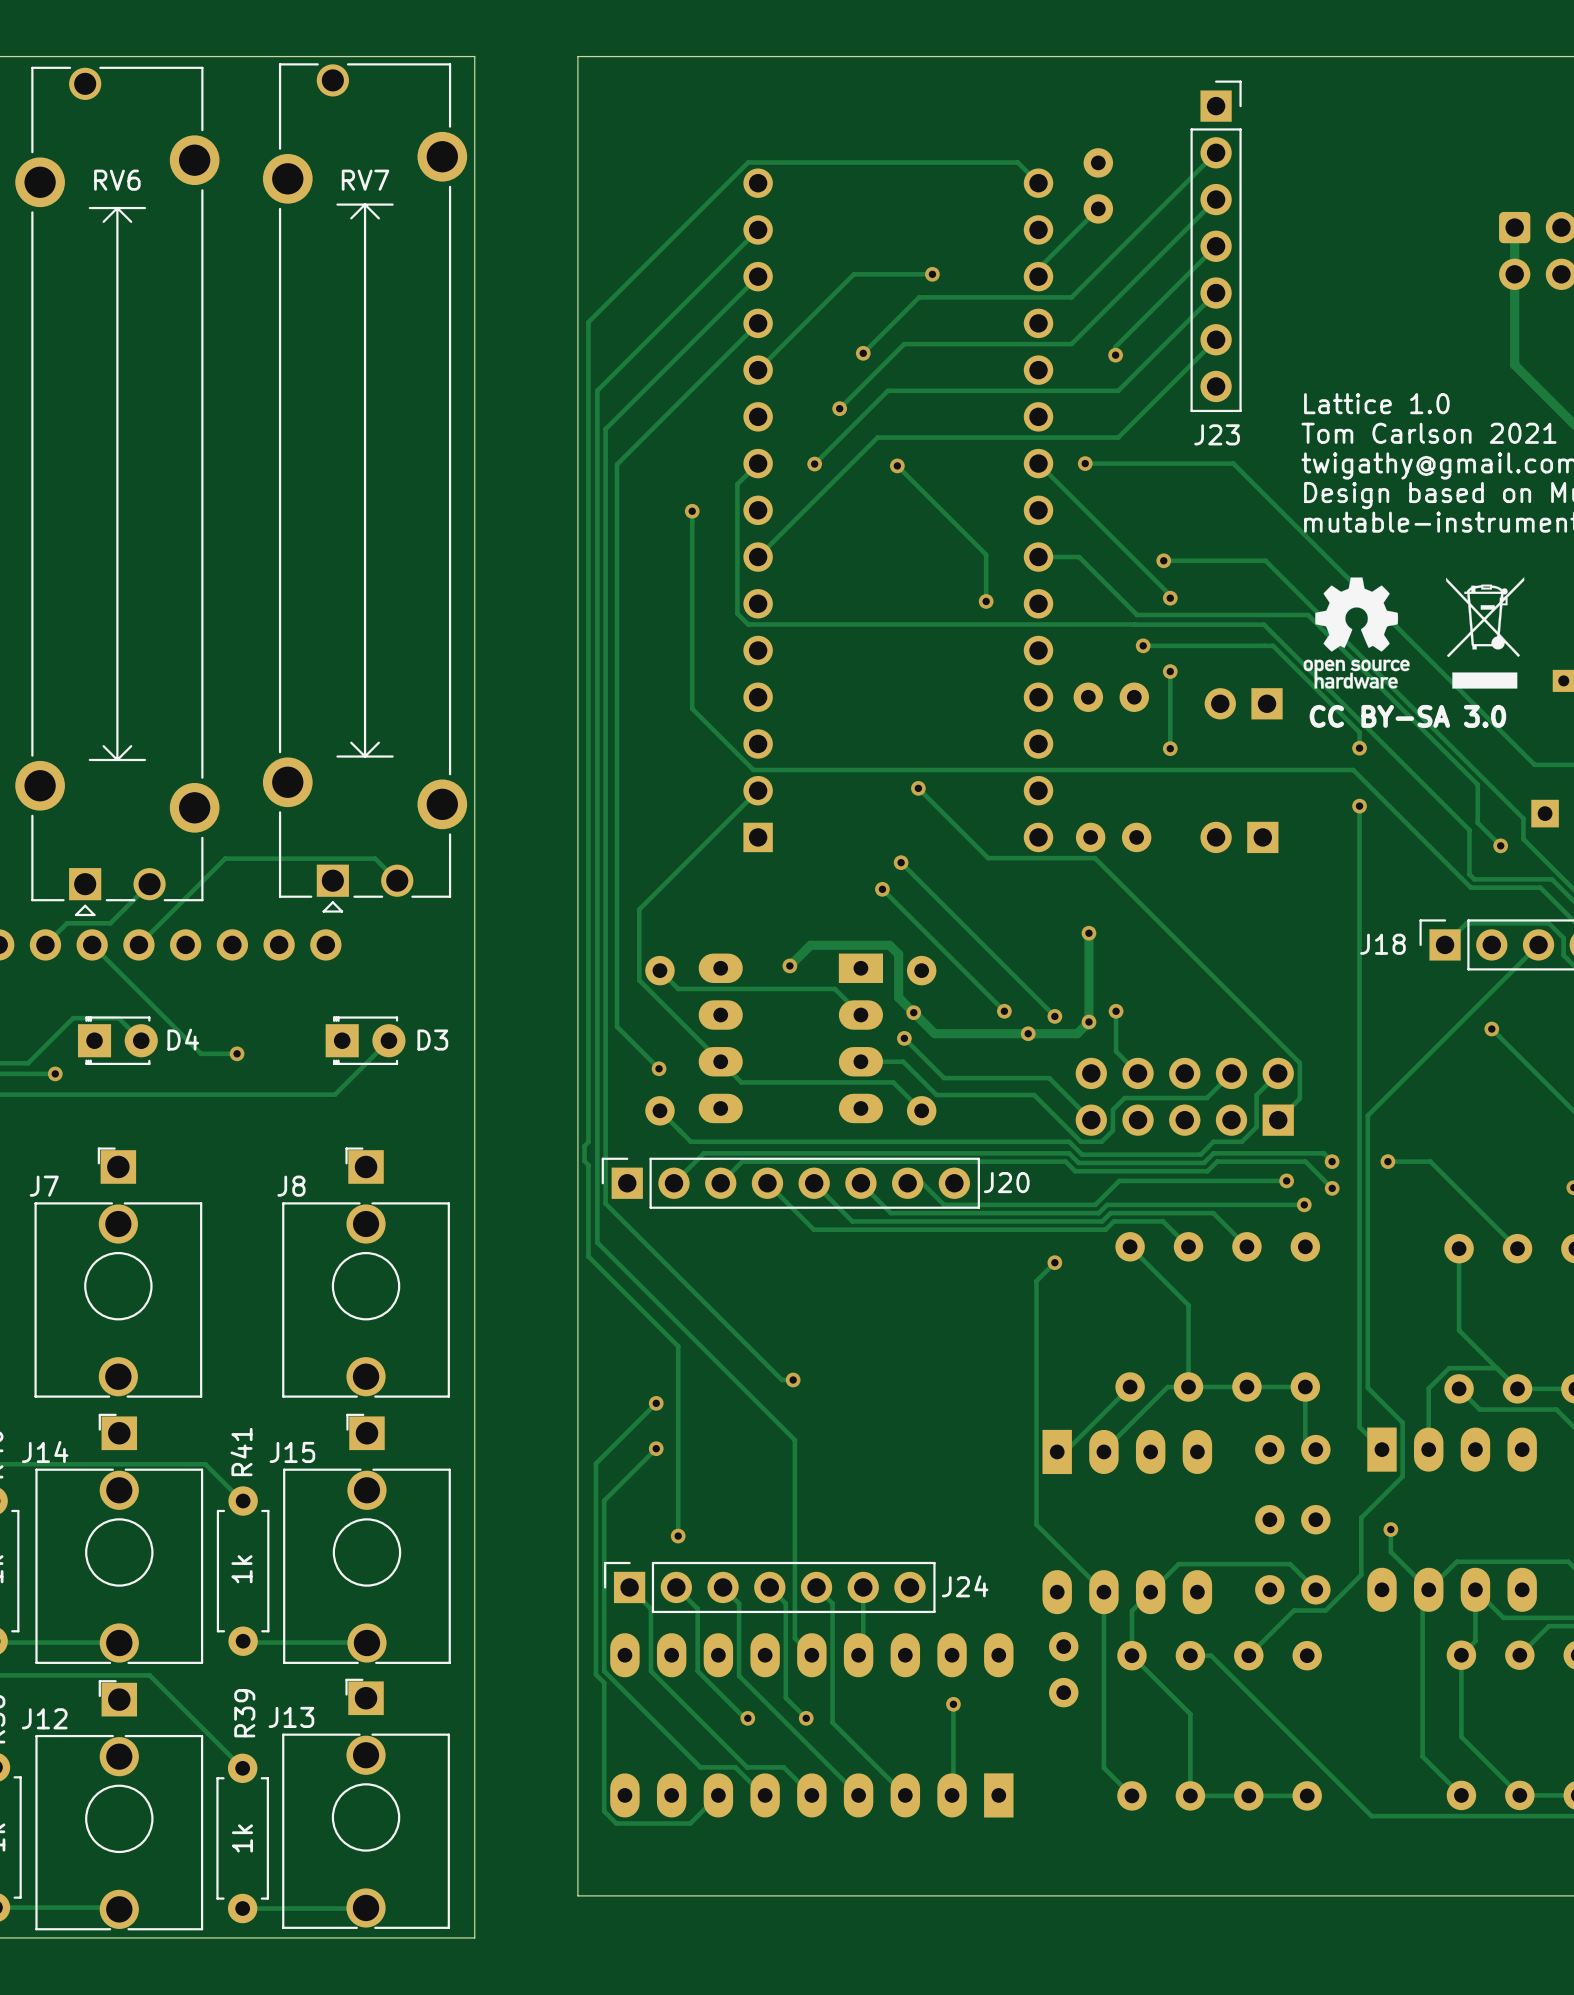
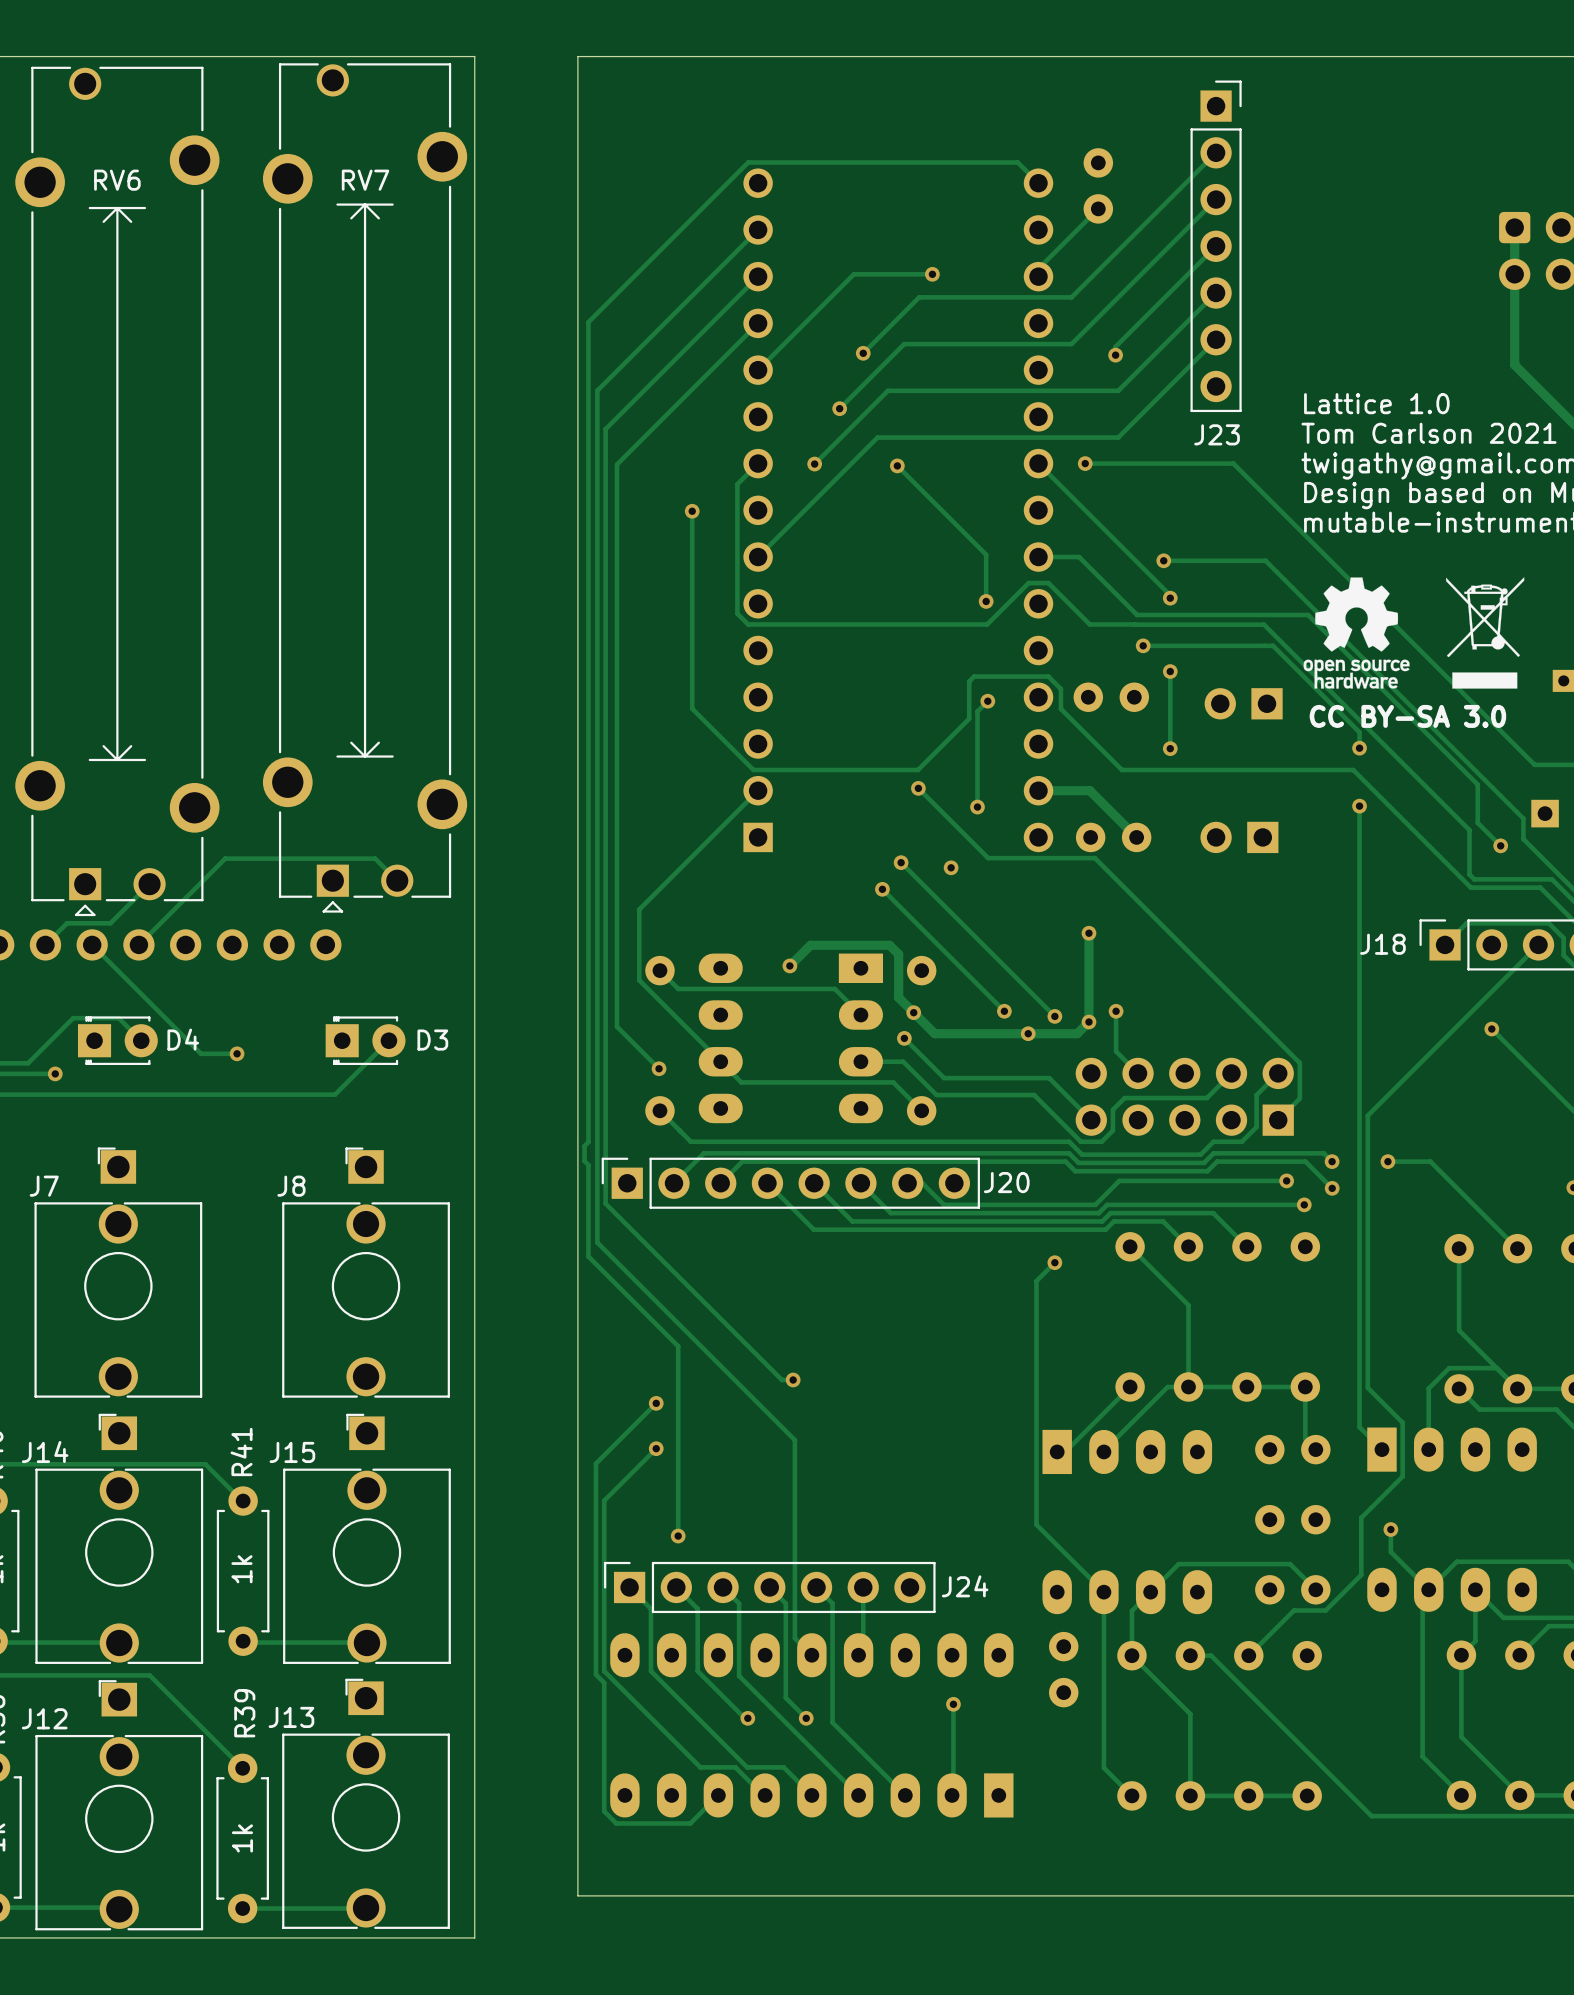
track: (987, 624) (1089, 624) -> (987, 624) (1028, 583) (1048, 583) (1089, 624)
track: none -> (987, 701) (977, 711) (977, 807)
via: none -> (987, 701)
track: (918, 770) (1122, 770) -> (918, 770) (969, 718) (969, 681) (974, 676) (1048, 676) (1060, 689) (1060, 708) (1122, 770)
track: none -> (1038, 790) (1089, 790) (1136, 837)
via: none -> (977, 807)
via: none -> (951, 867)

